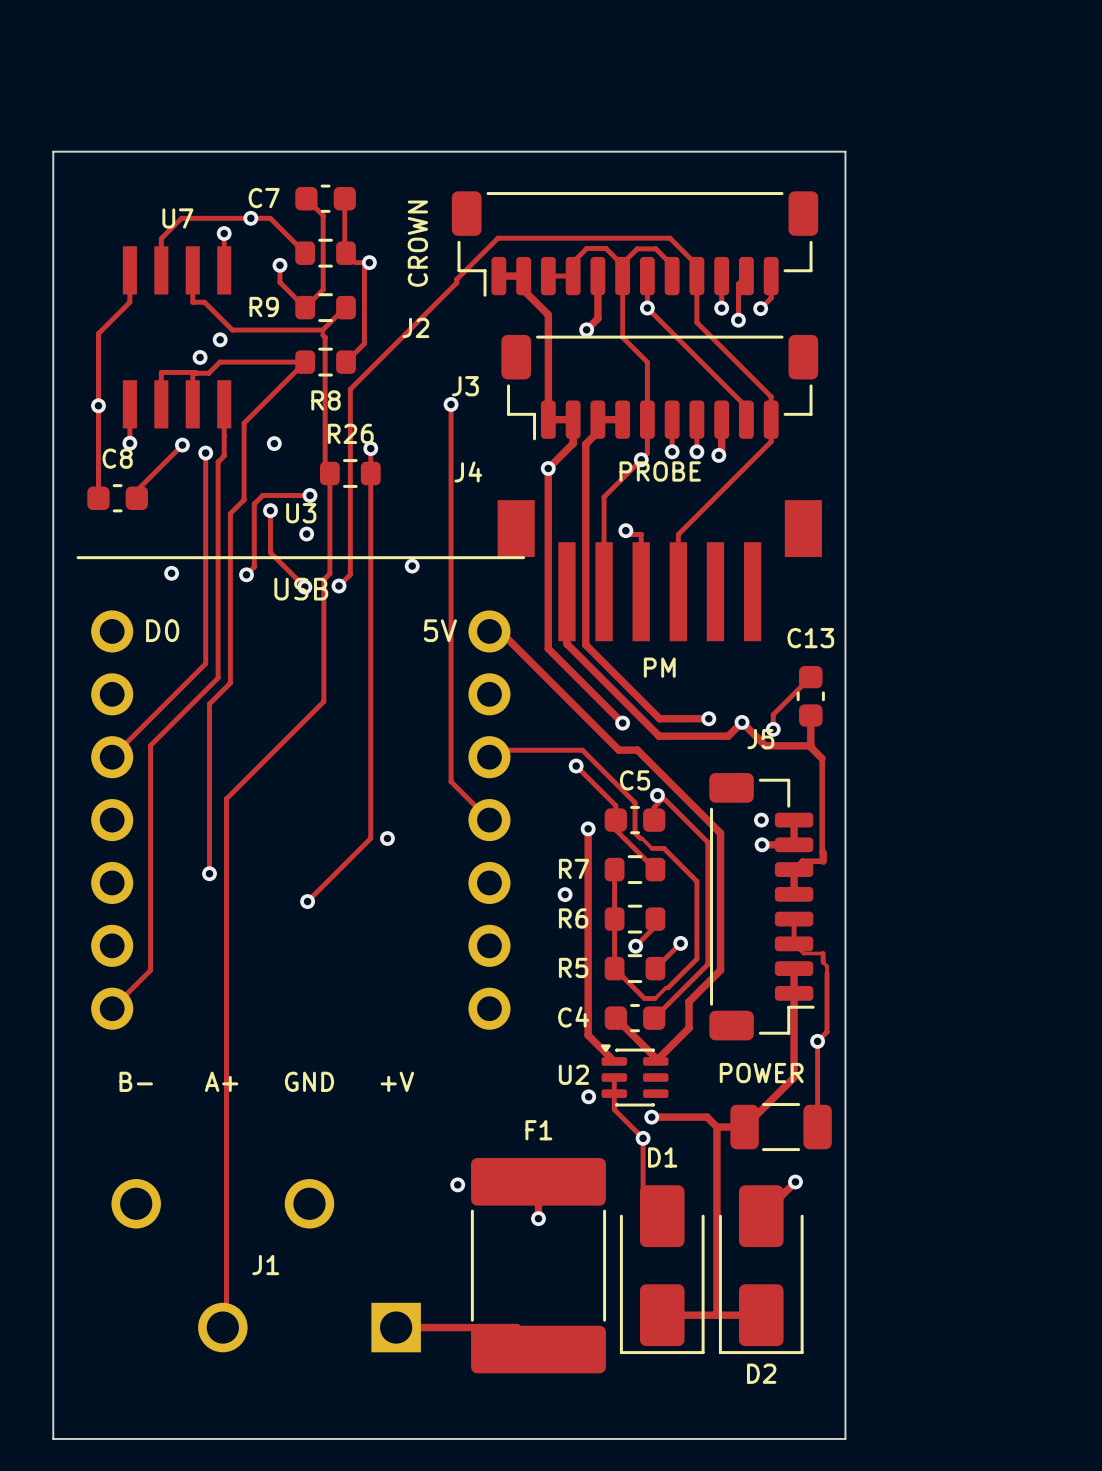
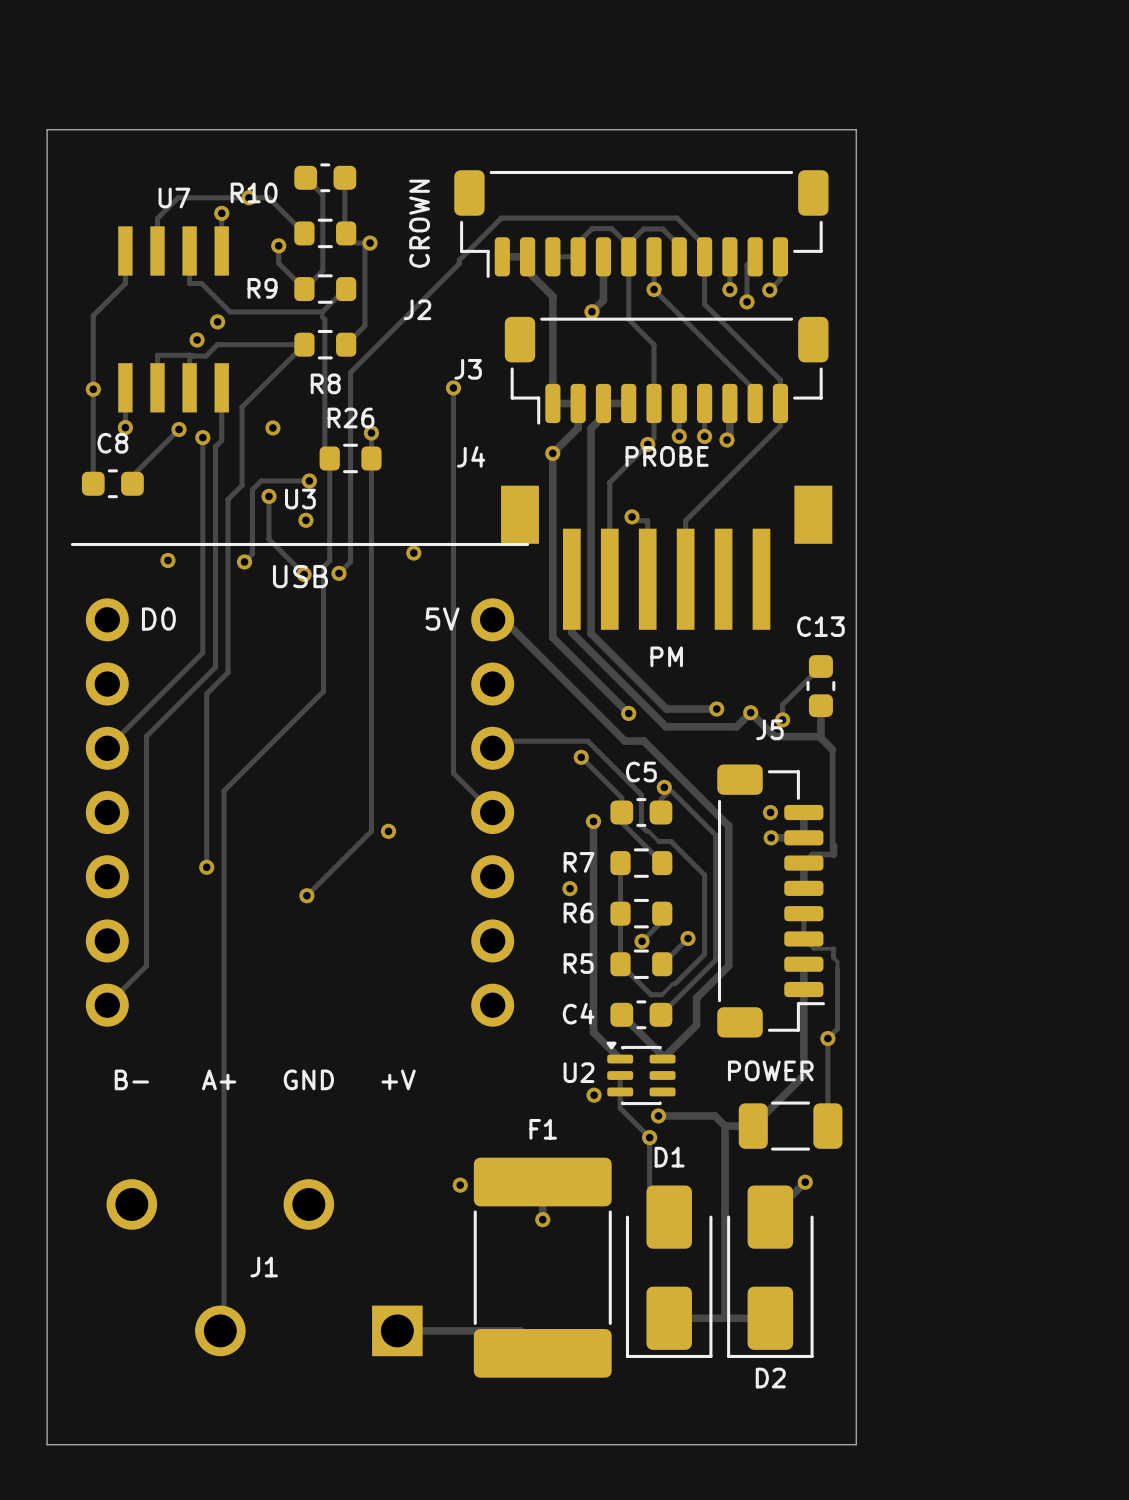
C7 name: C7 (264, 198) -> none
R10 name: none -> R10 (254, 192)

